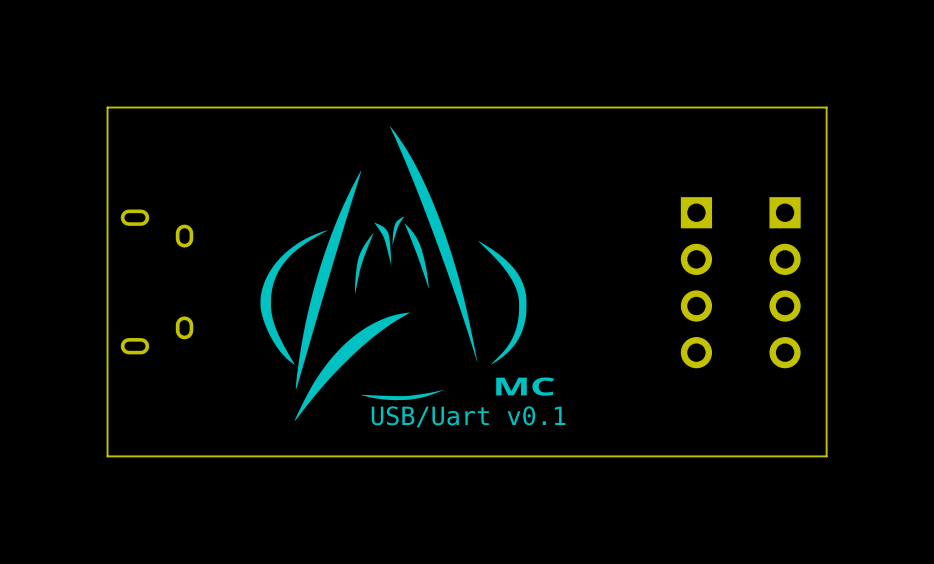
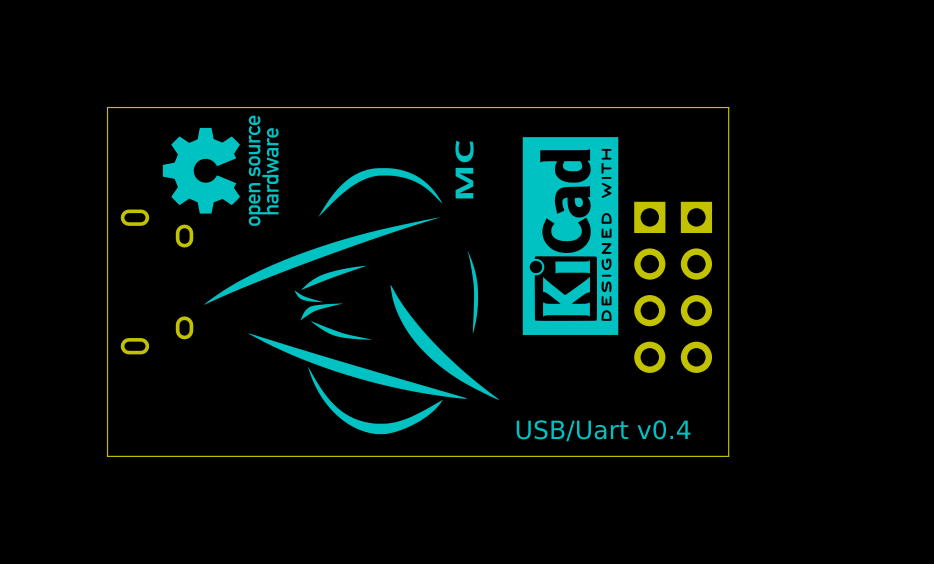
board edge: (728, 107) (826, 107) (826, 456) (728, 456) -> (728, 107) (728, 456)
drawing: none -> [162, 115, 499, 435]
drawing: [260, 125, 555, 422] -> none
drawing: none -> [522, 137, 619, 335]
part: (696, 282) -> none
part: (785, 282) -> none
part: none -> (673, 287)
text: USB/Uart v0.1 (468, 416) -> USB/Uart v0.4 (603, 430)

